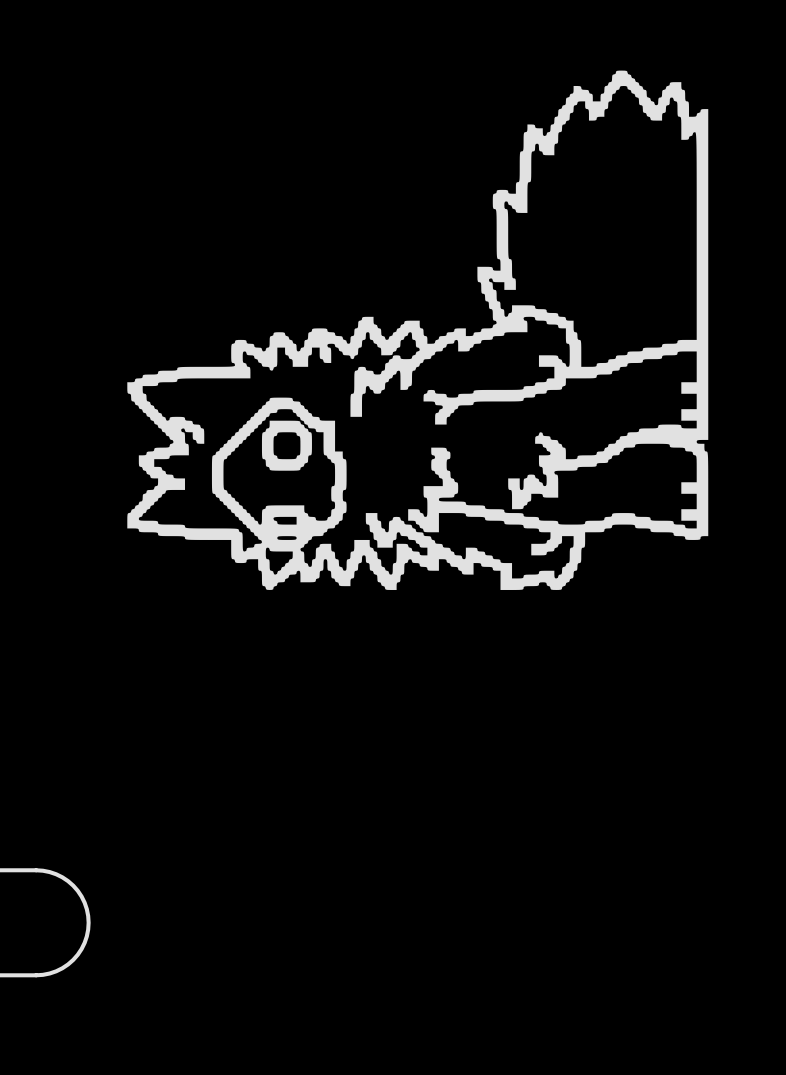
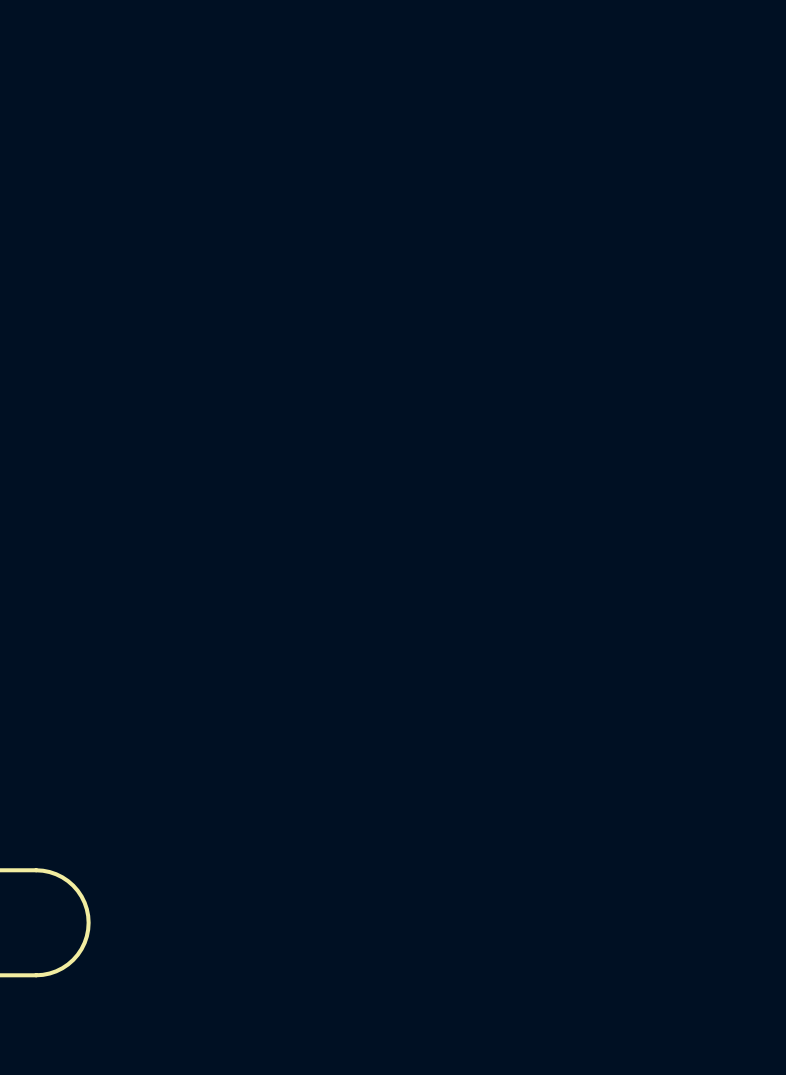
drawing: [127, 70, 709, 590] -> none

